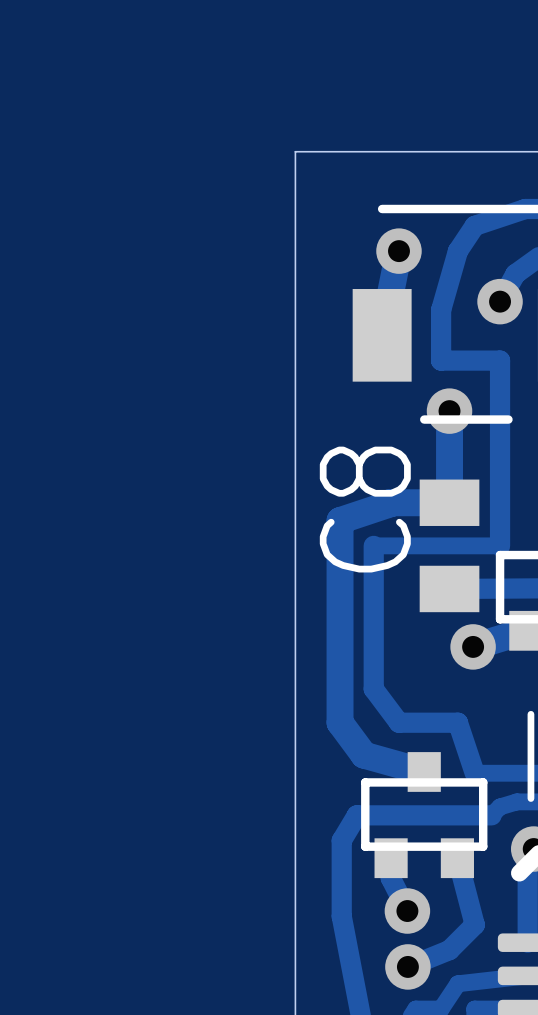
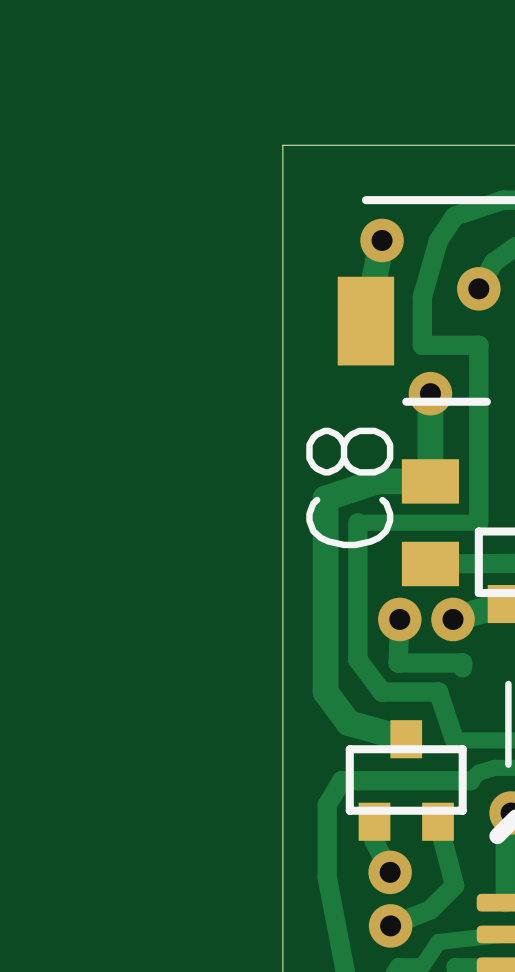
track: none -> (399, 619) (398, 663) (462, 663) (462, 667)
via: none -> (399, 619)

